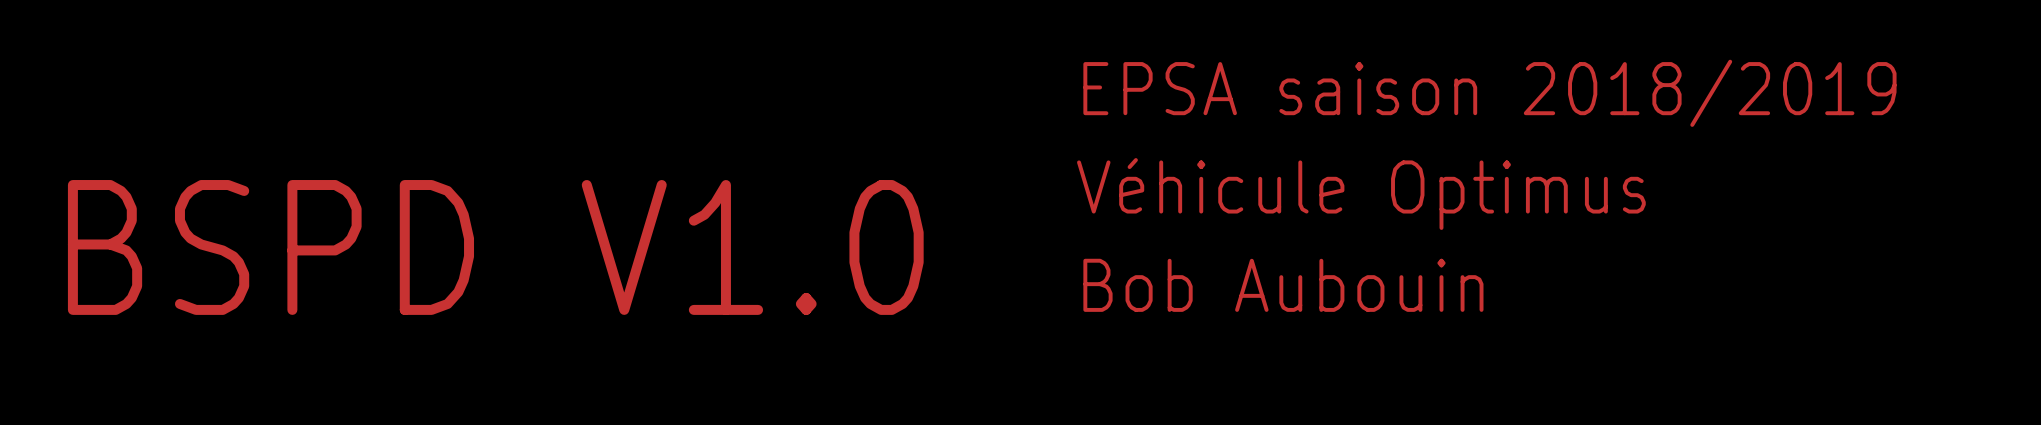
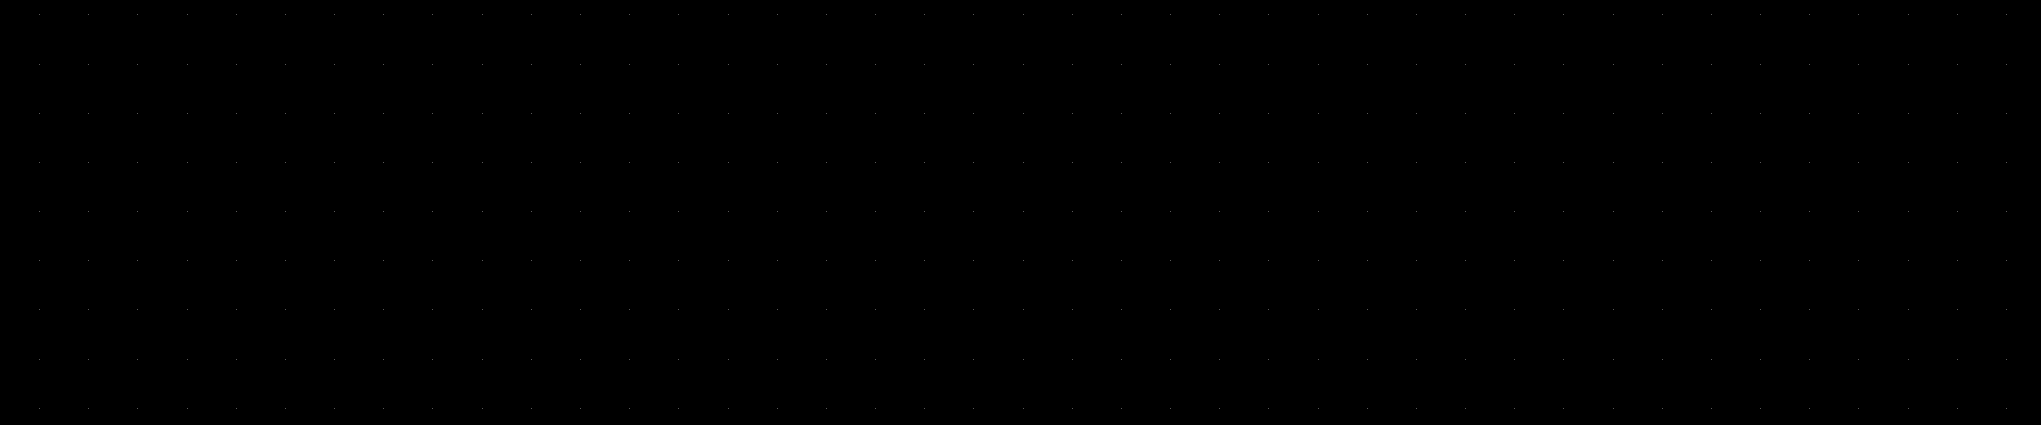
text: EPSA saison 2018/2019 (1489, 93) -> none
text: Véhicule Optimus (1361, 194) -> none
text: BSPD V1.0 (495, 247) -> none
text: Bob Aubouin (1283, 285) -> none

